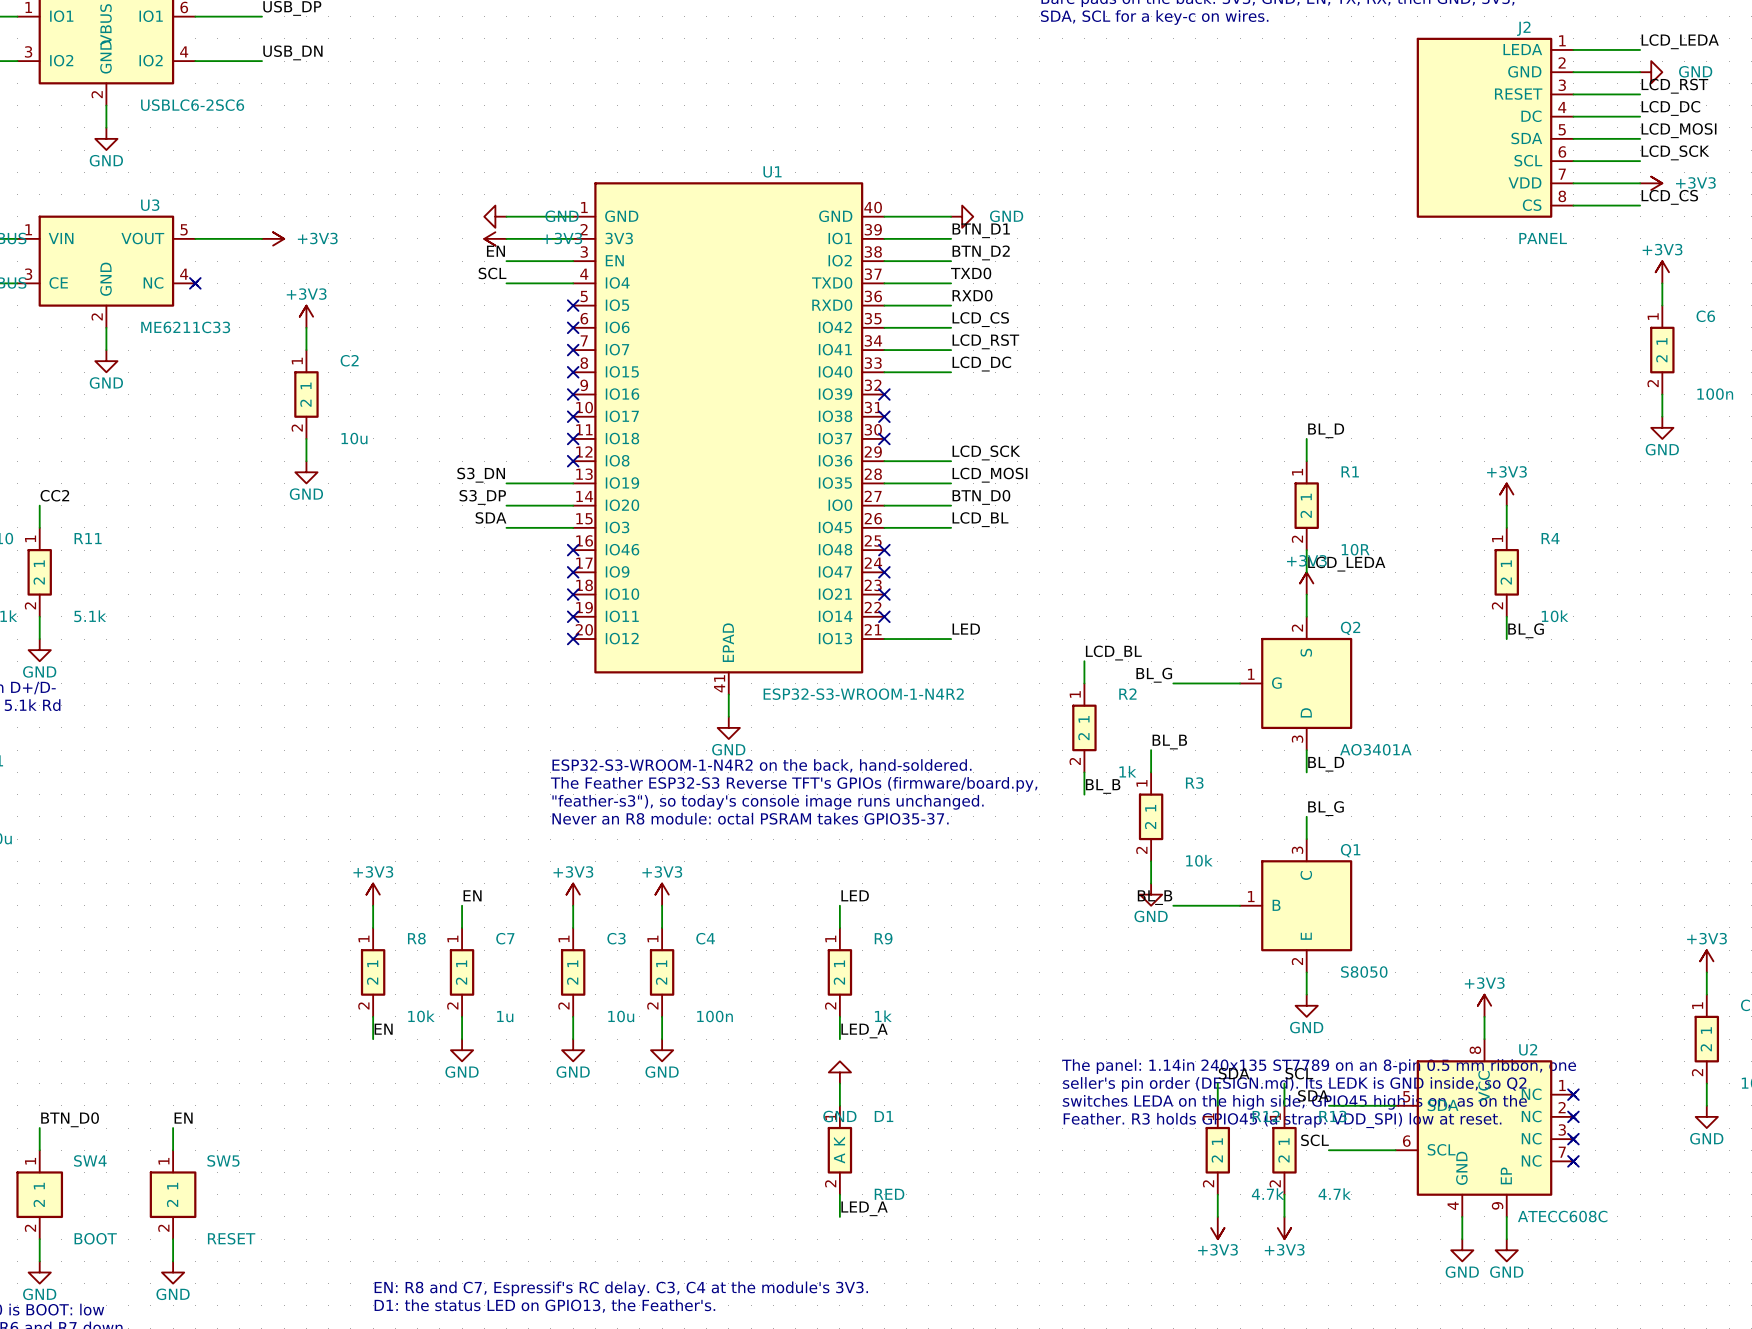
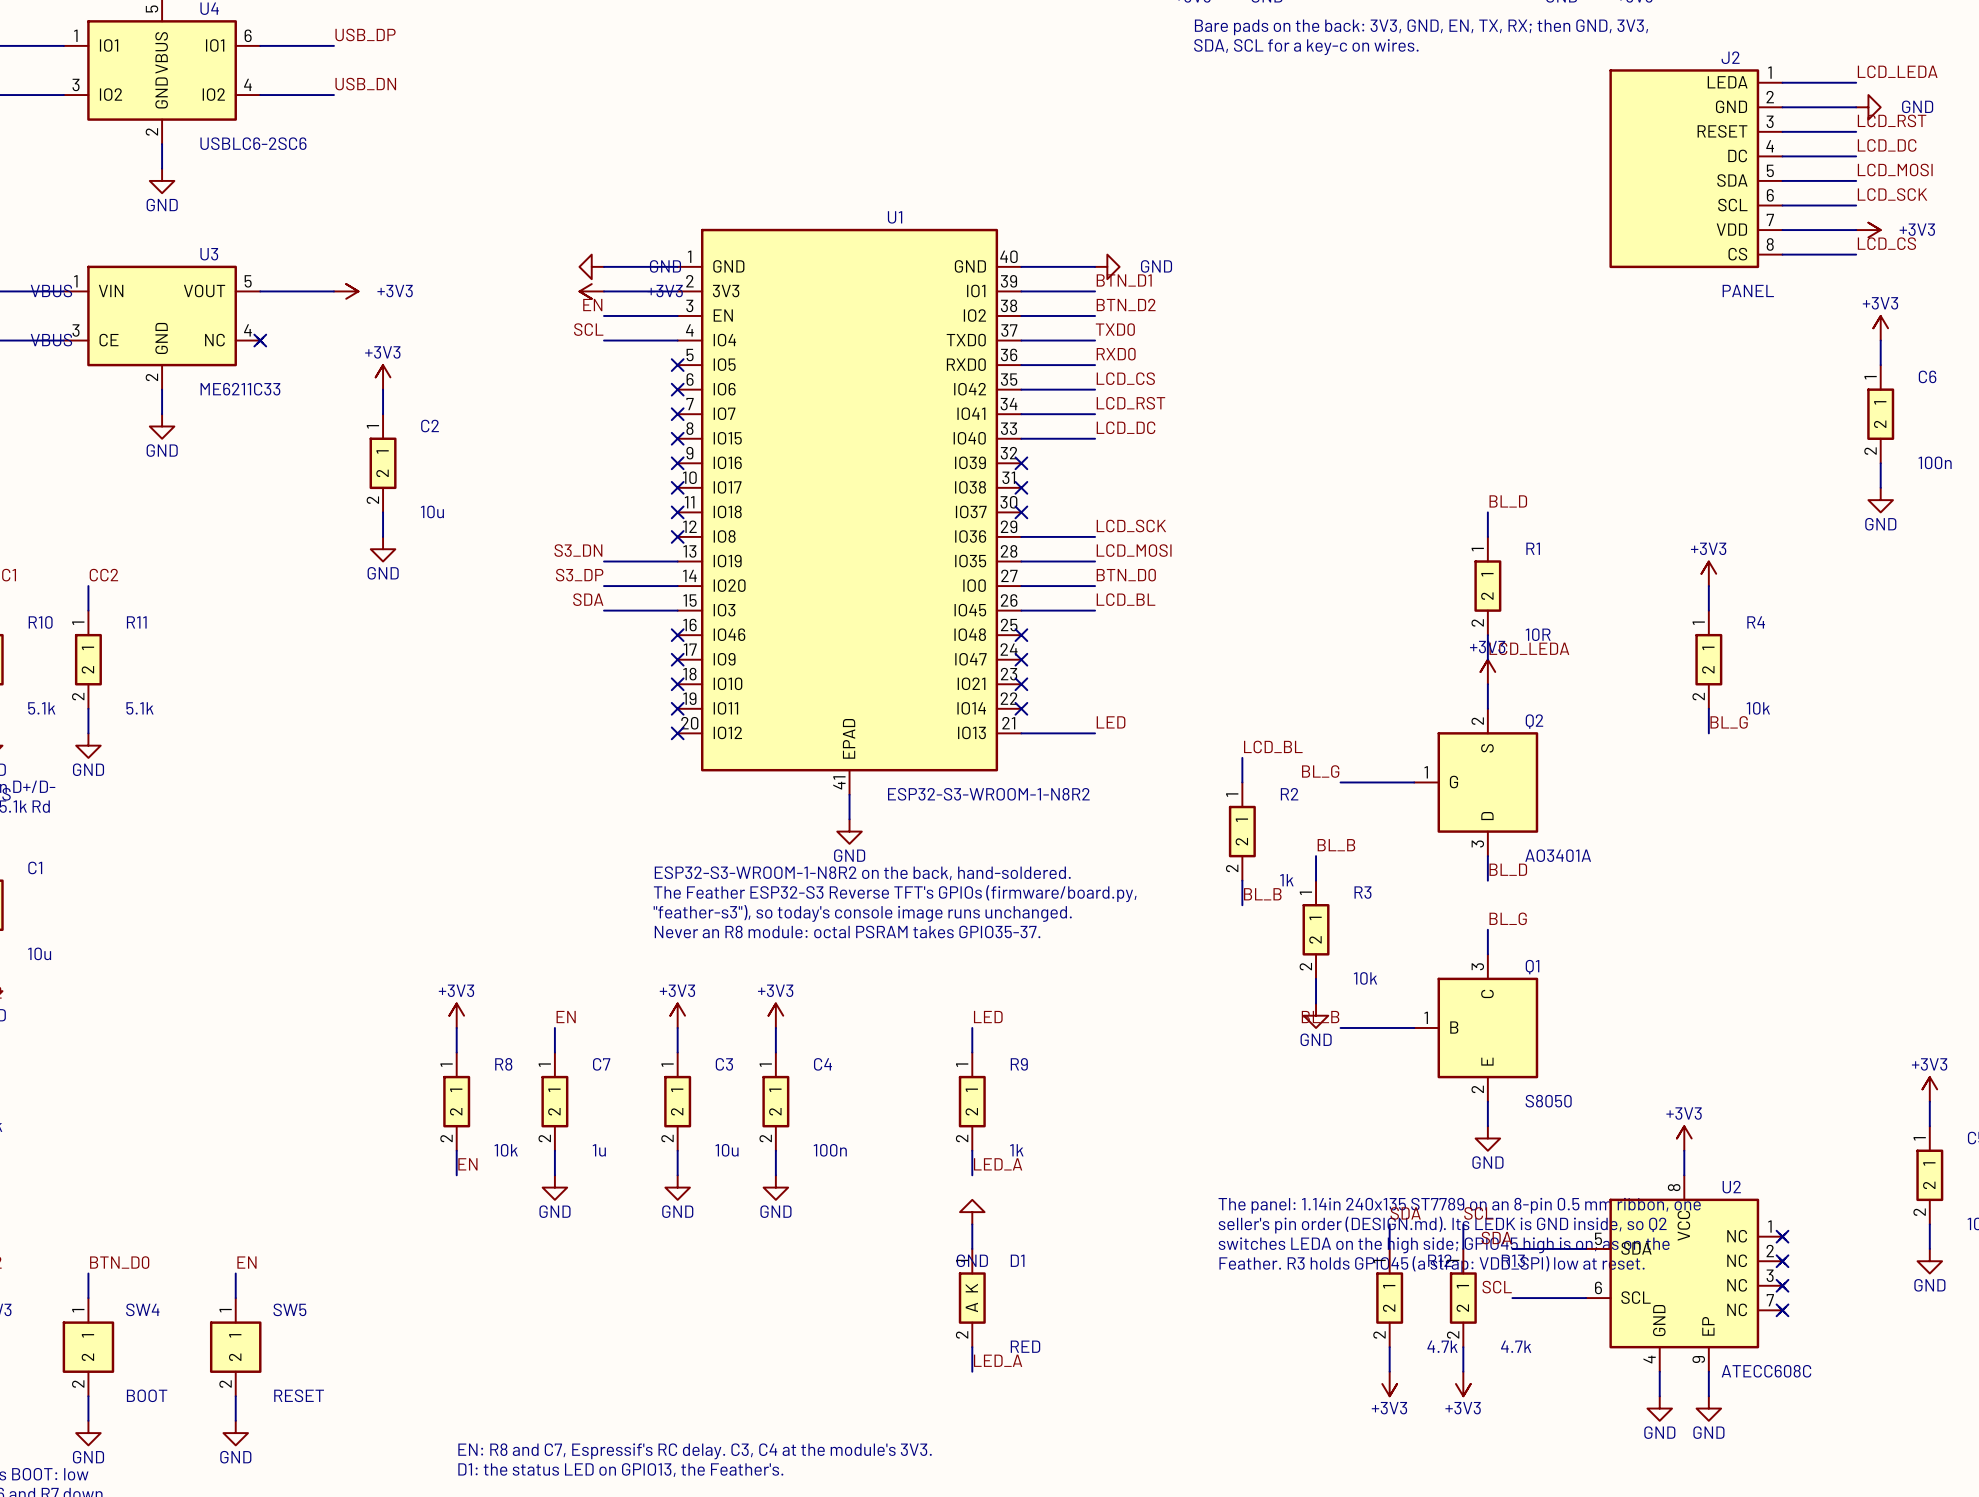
U1 value: ESP32-S3-WROOM-1-N4R2 (863, 694) -> ESP32-S3-WROOM-1-N8R2 (988, 794)
text: ESP32-S3-WROOM-1-N4R2 on the back, hand-soldered. (761, 765) -> ESP32-S3-WROOM-1-N8R2 on the back, hand-soldered. (862, 873)

